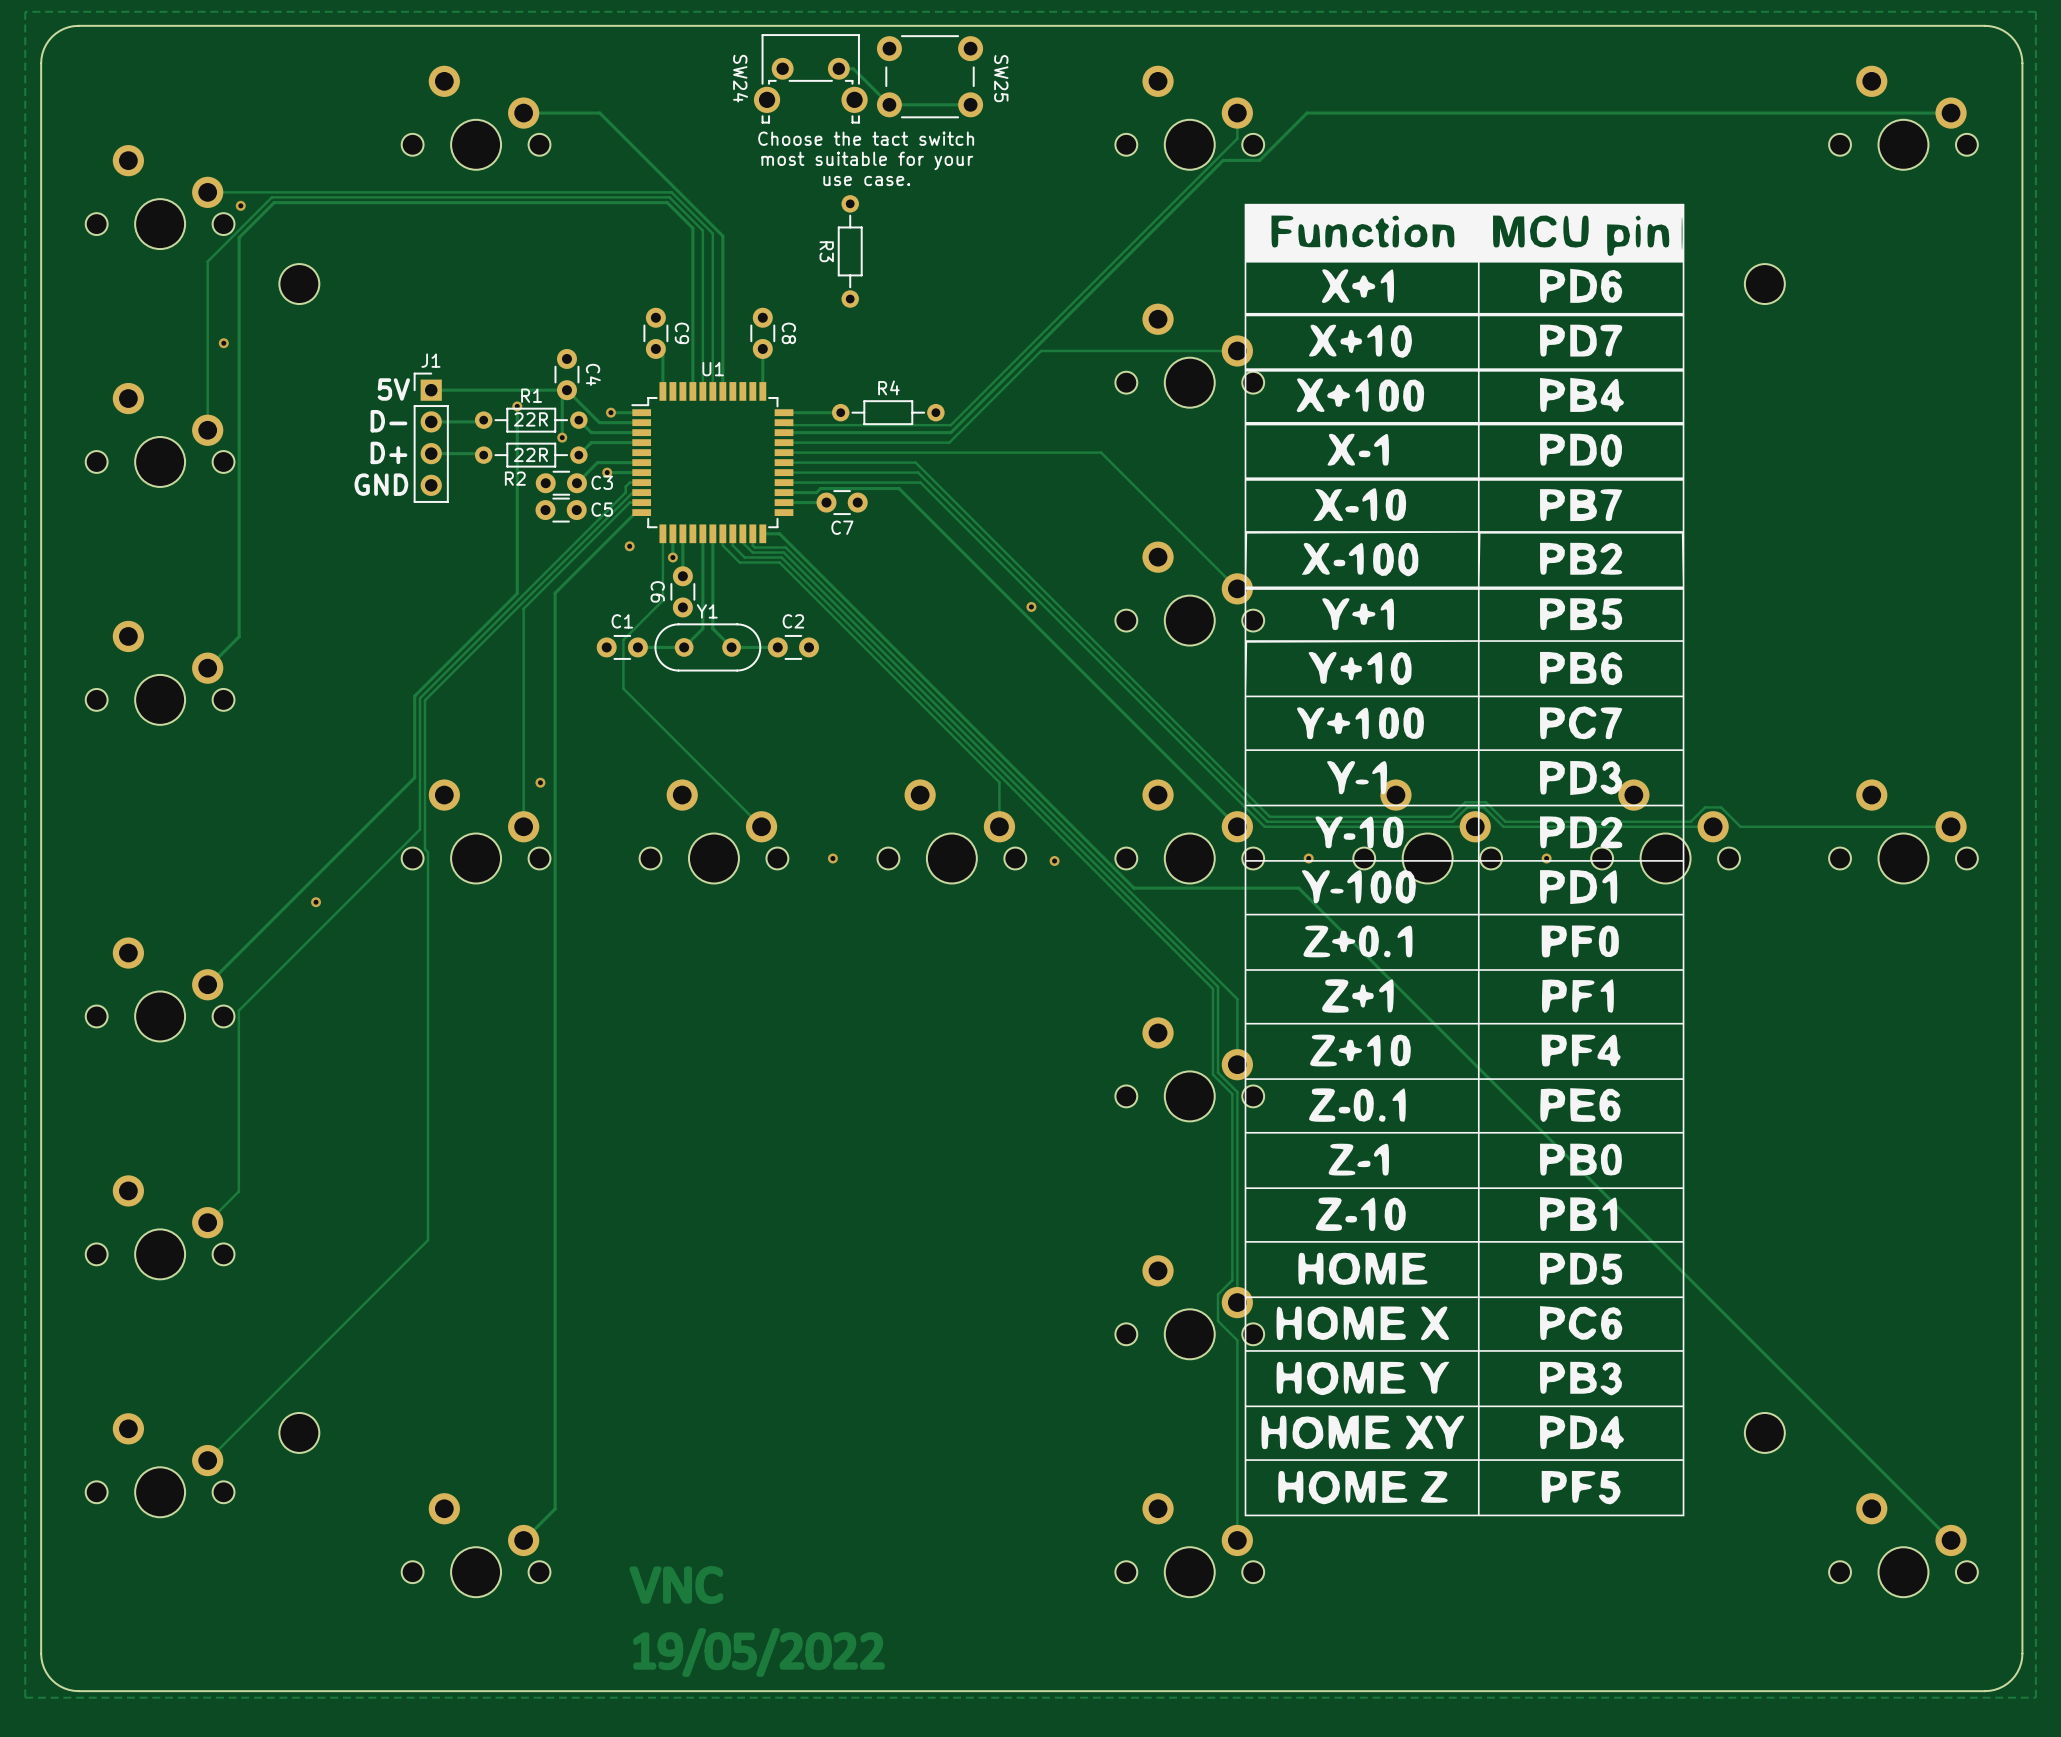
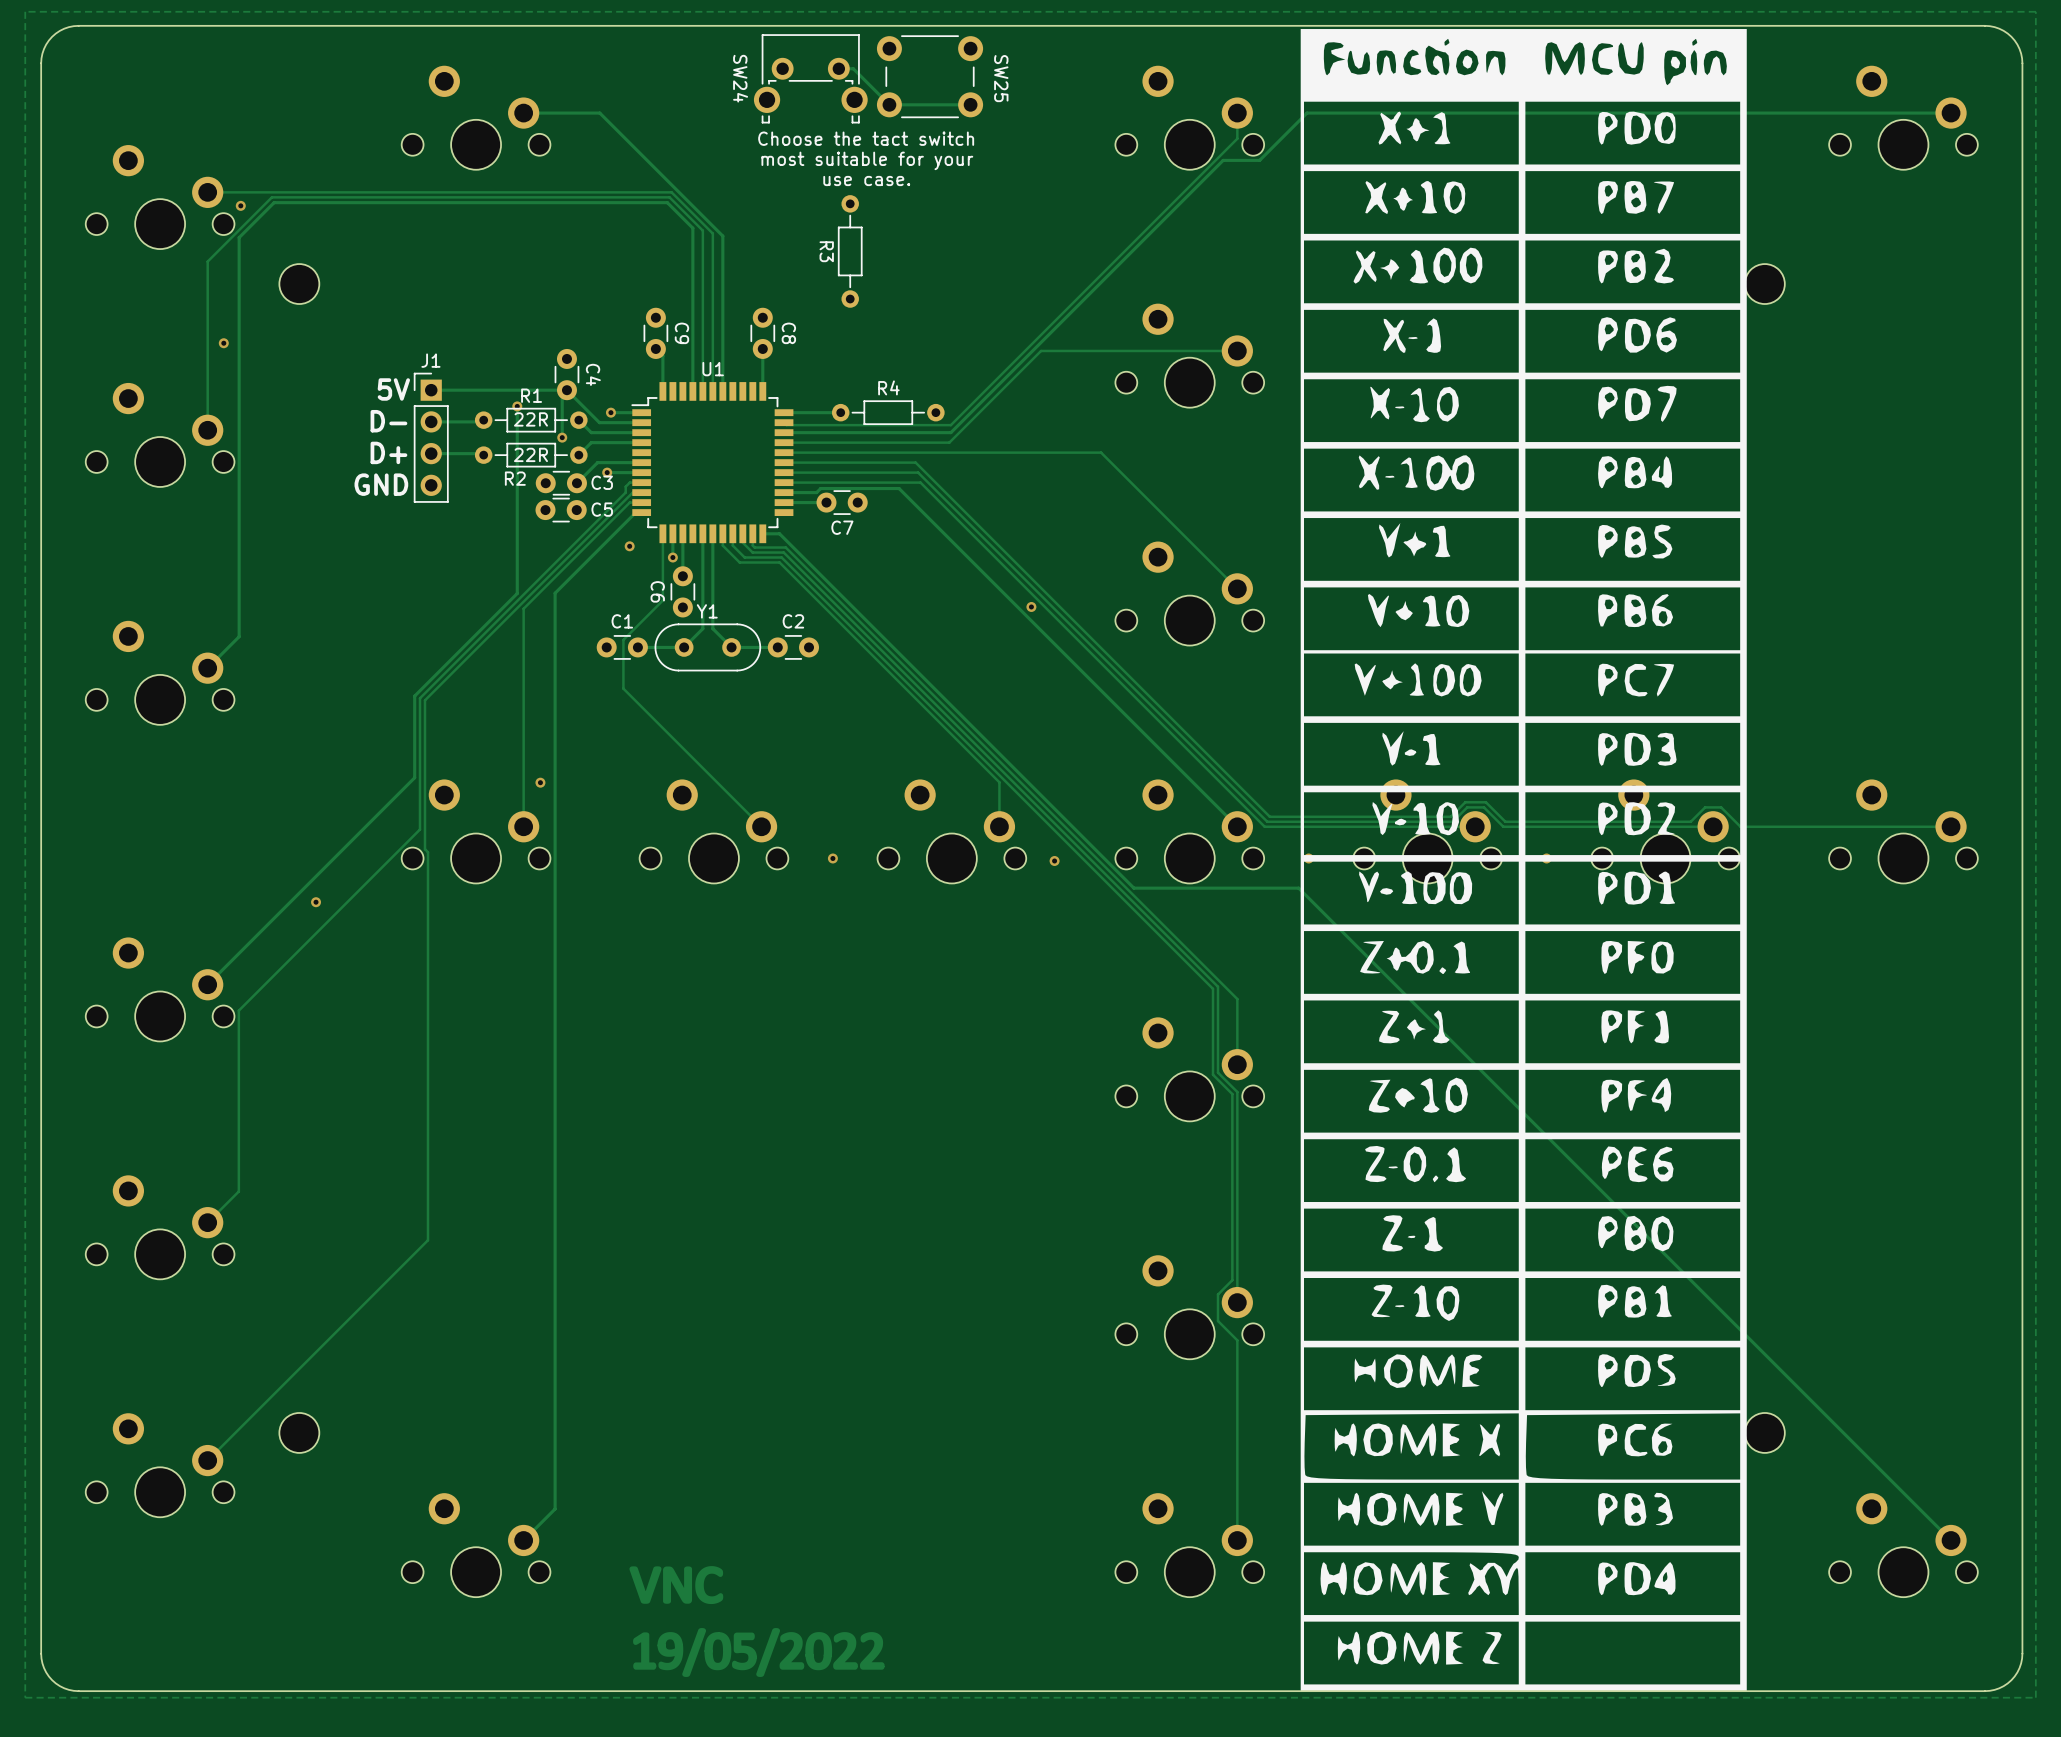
drawing: none -> [1300, 29, 1747, 1692]
drawing: [1244, 203, 1685, 1517] -> none

